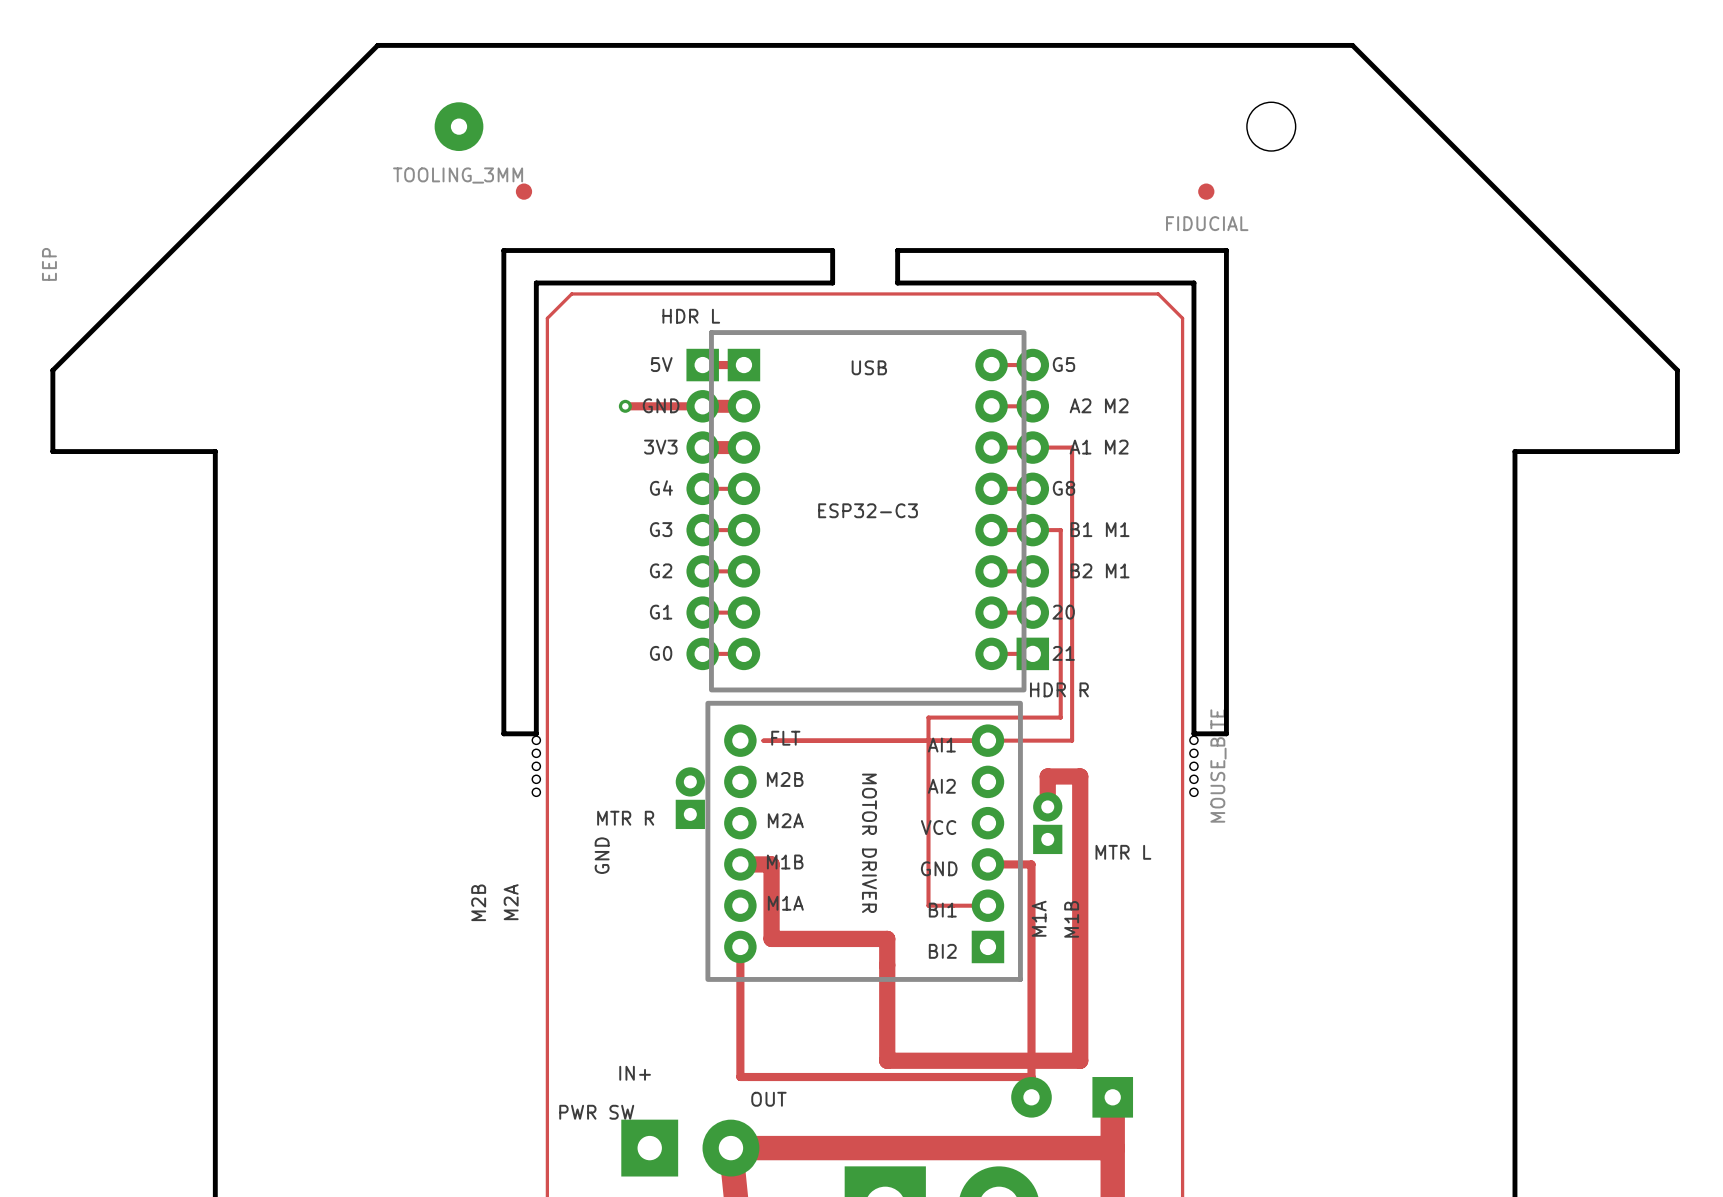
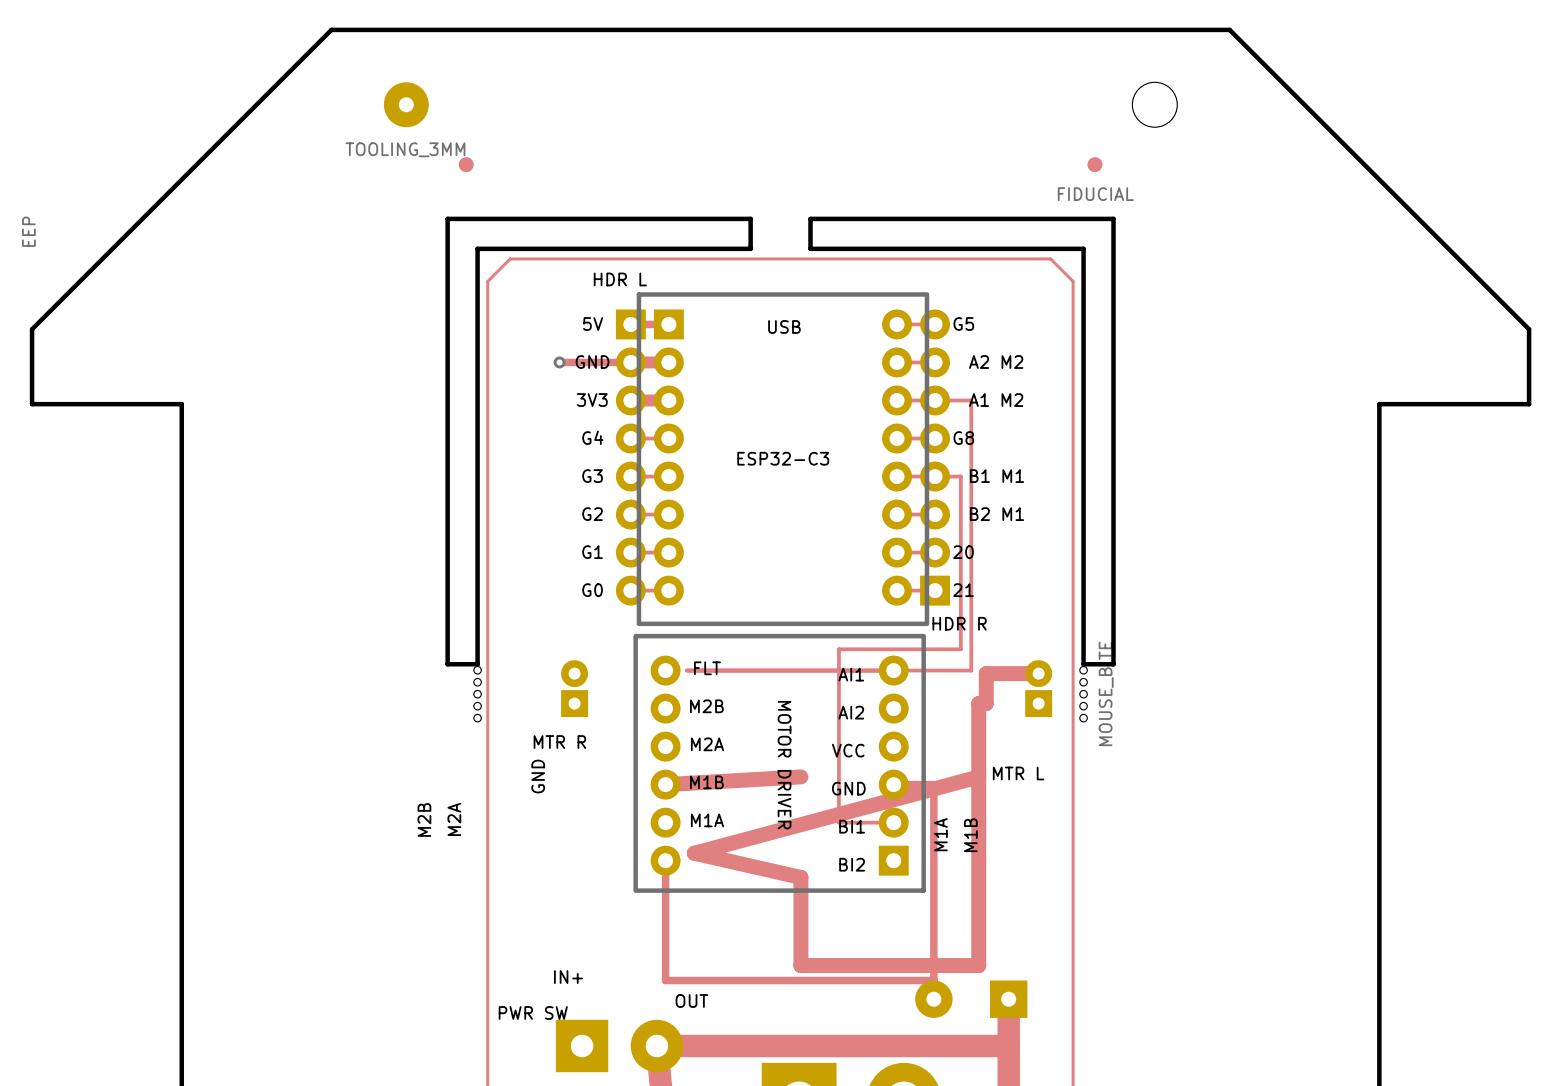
track: (1080, 776) (1047, 776) (1047, 806) -> (978, 703) (986, 703) (986, 673) (1038, 673)
part position: (690, 798) -> (574, 688)
part position: (1047, 823) -> (1038, 688)
track: none -> (978, 776) (694, 853) (800, 877)
track: (740, 864) (771, 864) (771, 938) (887, 938) (887, 965) -> (665, 784) (800, 776)

